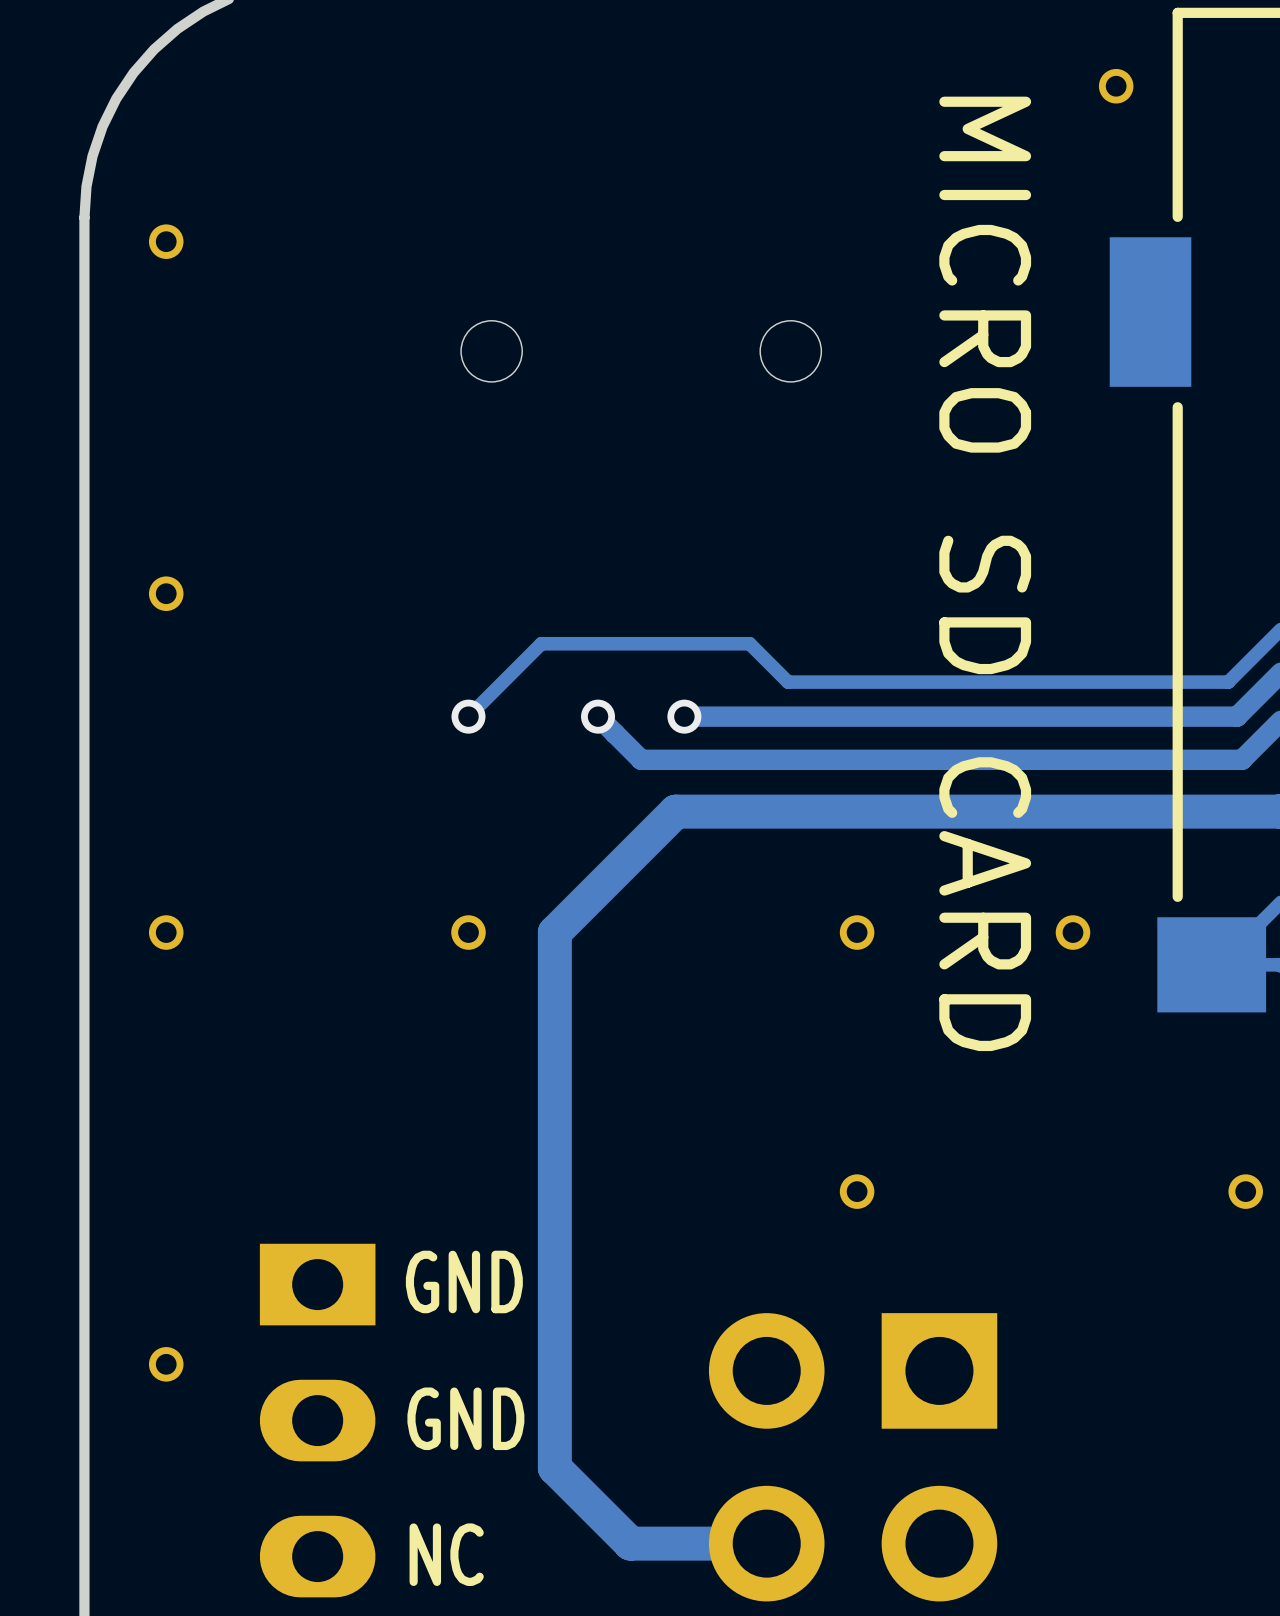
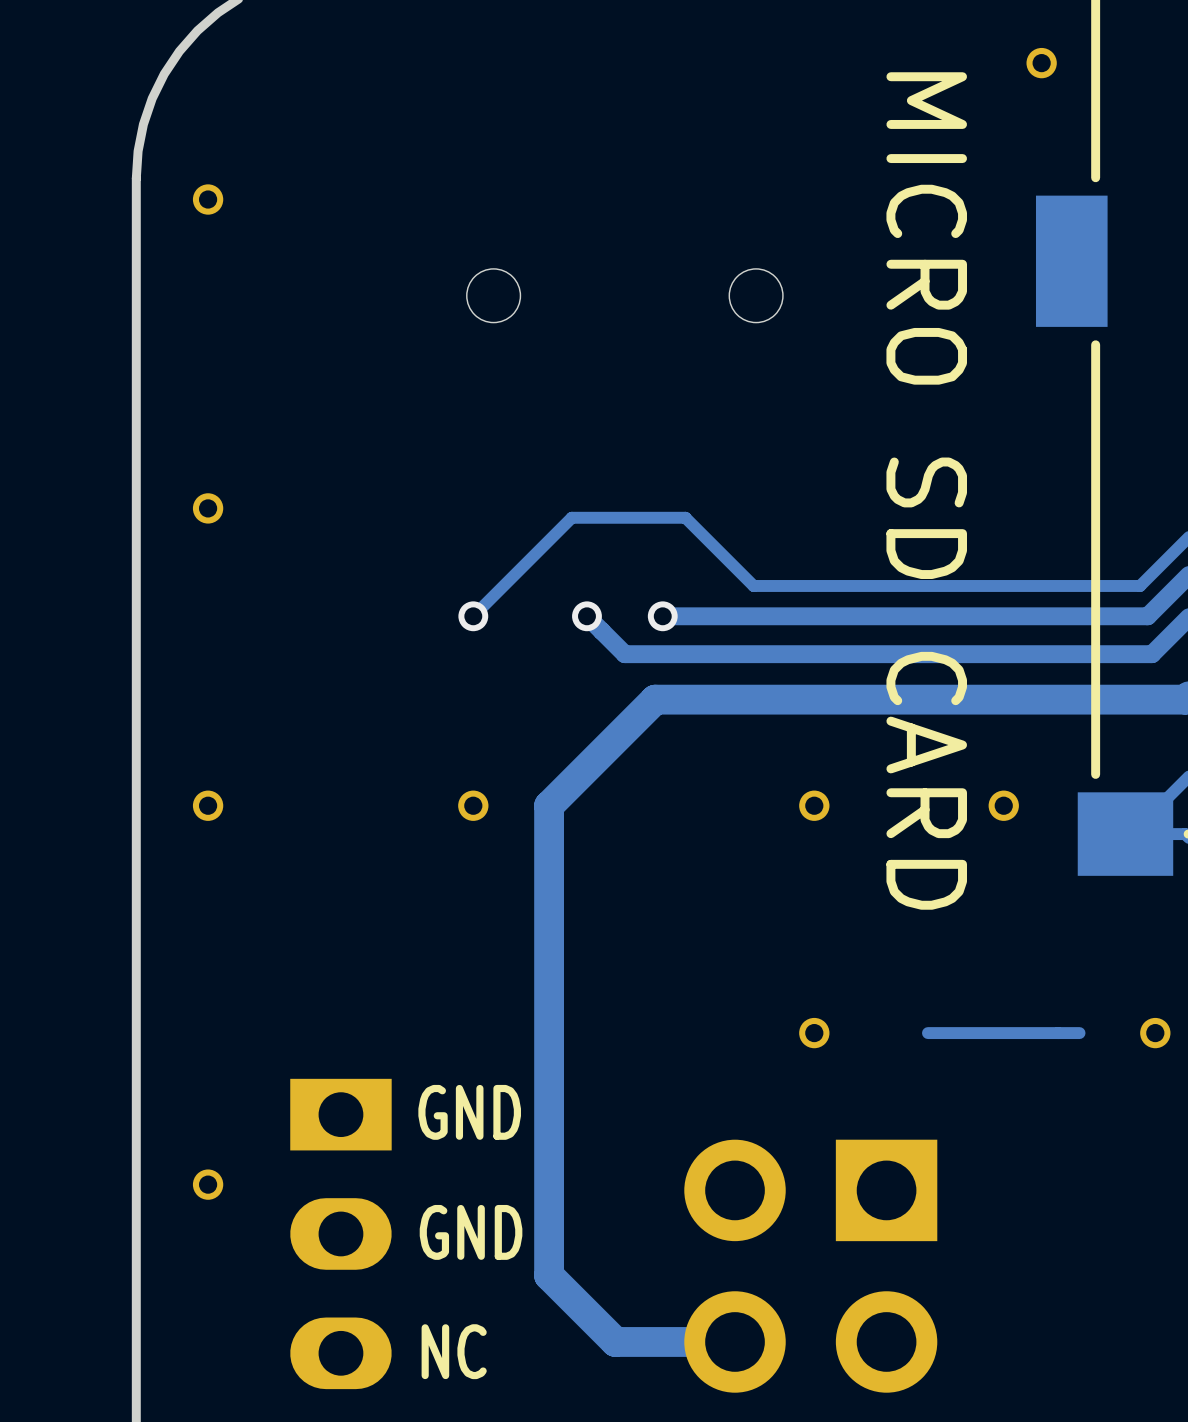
track: (749, 643) (541, 643) -> (720, 552) (685, 517) (571, 517) (537, 552)
track: none -> (1079, 1033) (927, 1033)

